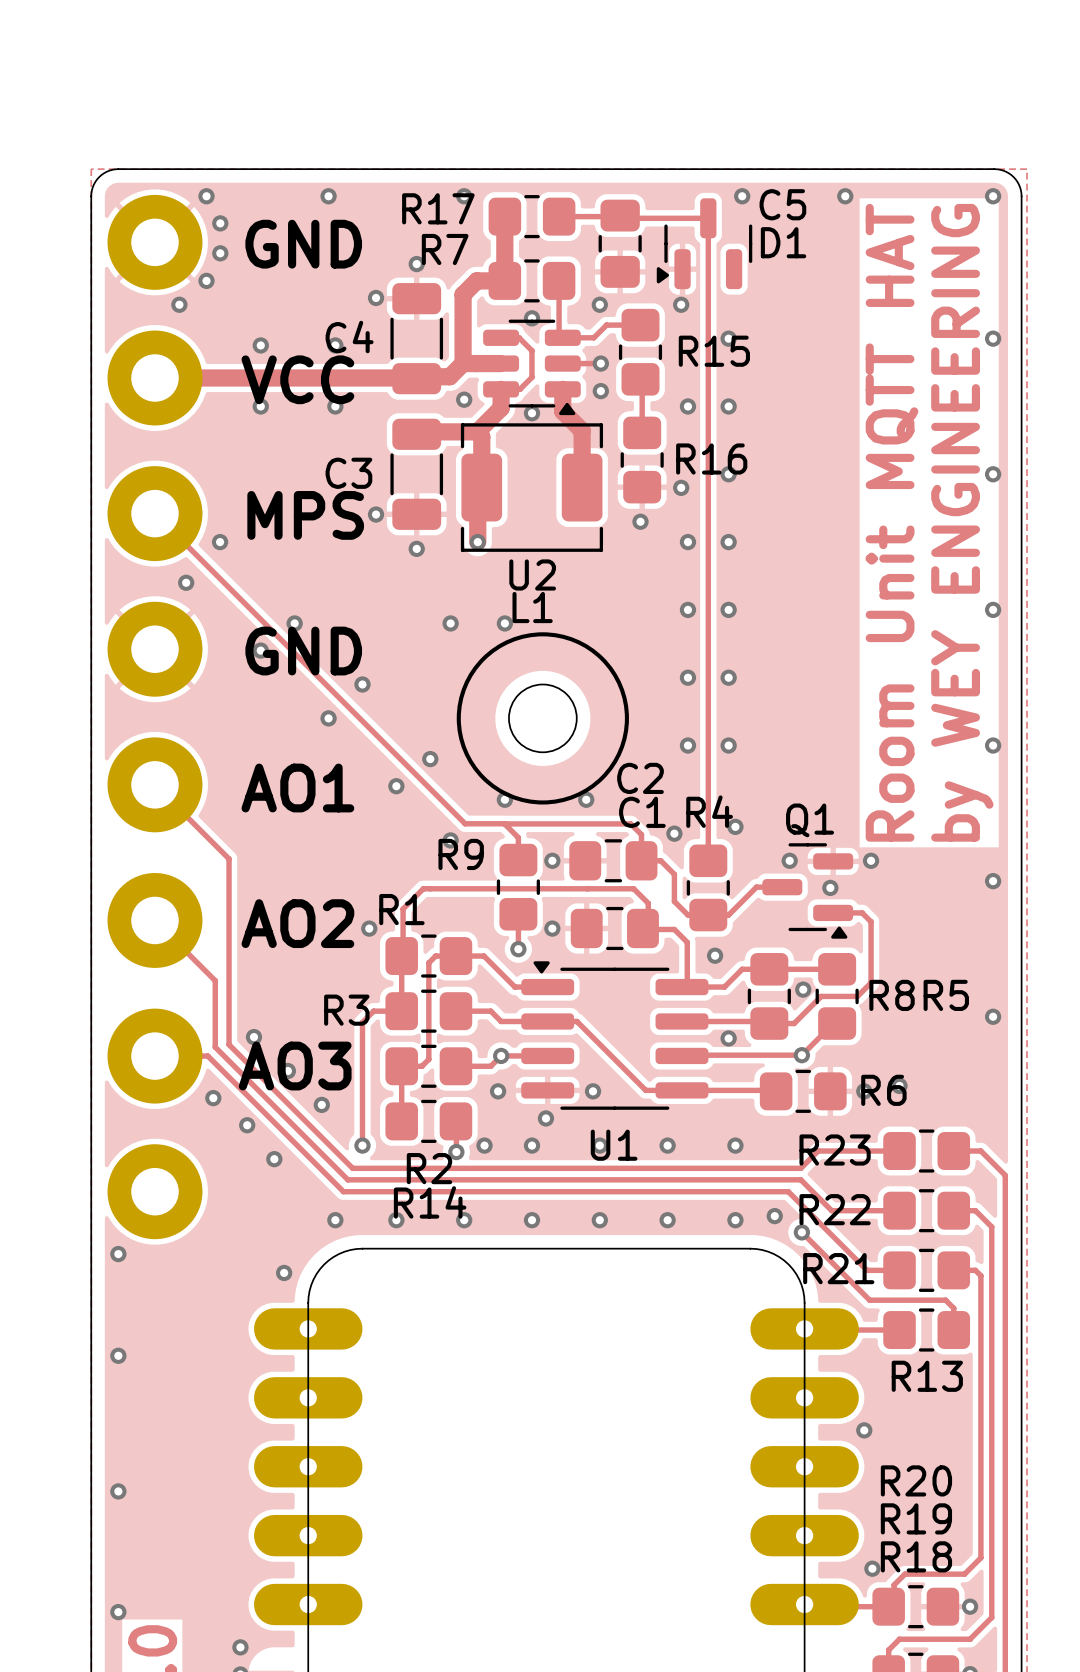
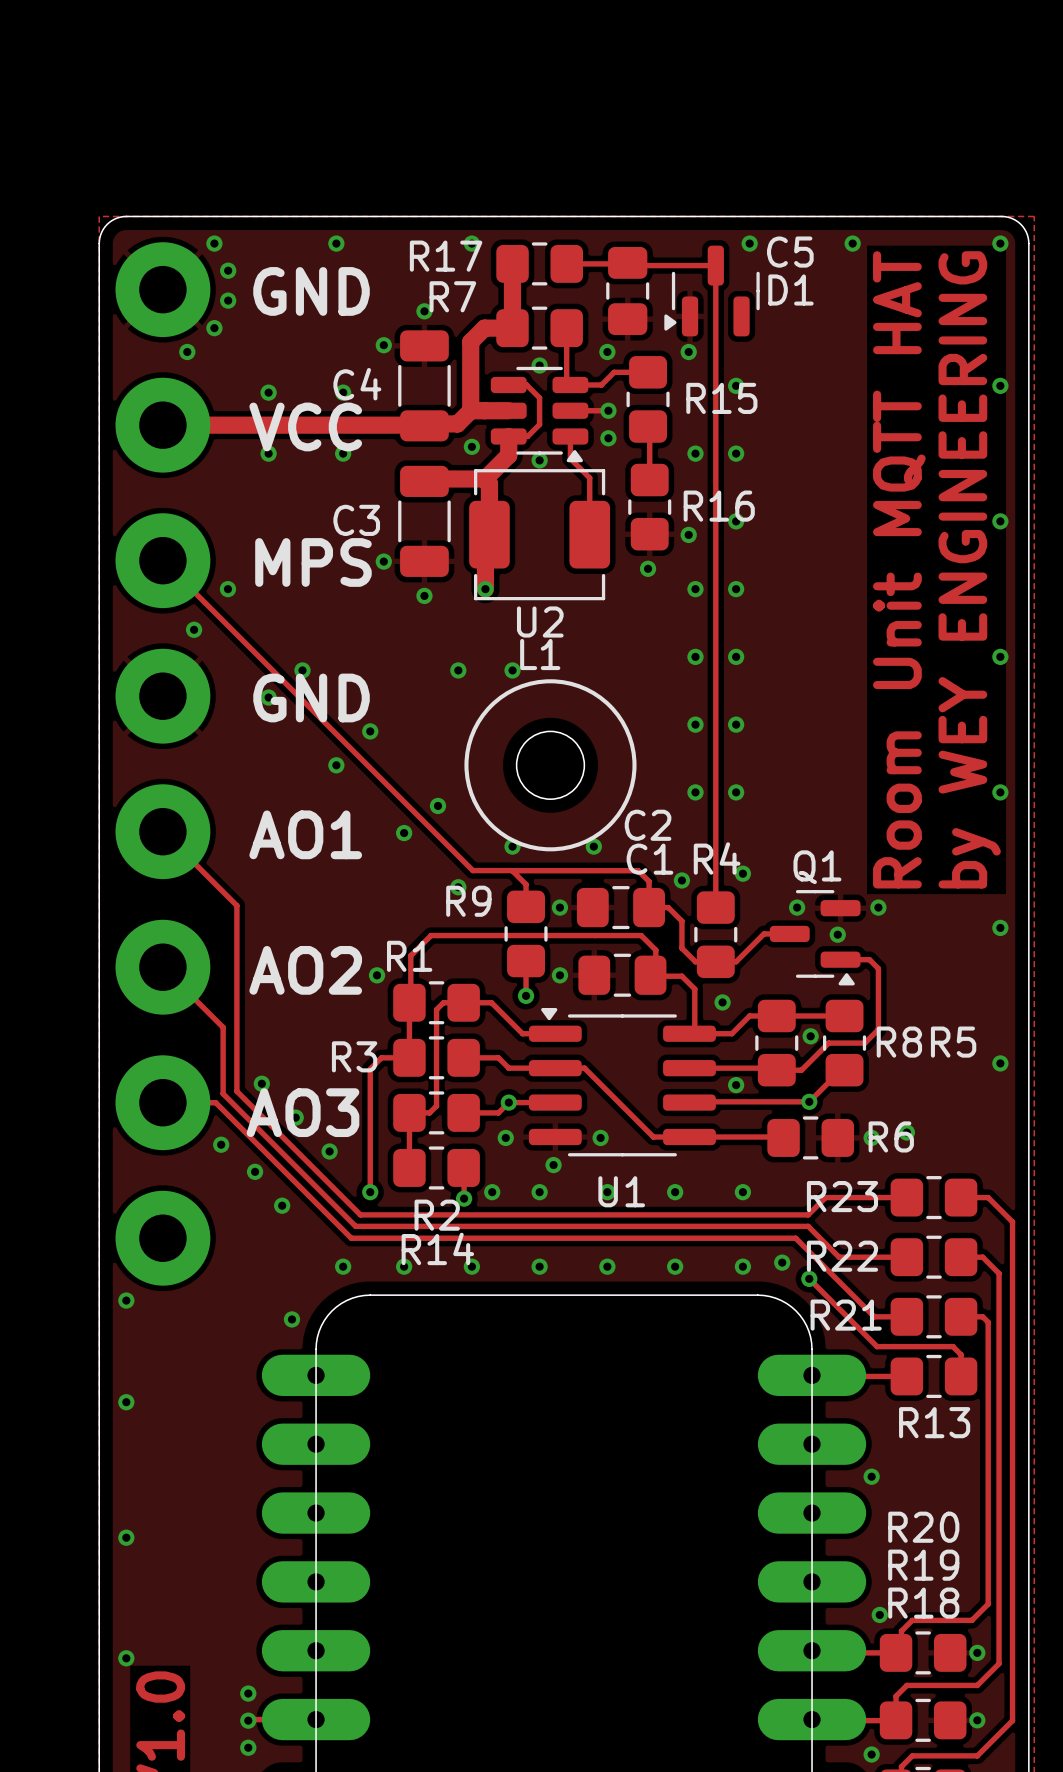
track width: thick (562, 389) (562, 411) (582, 430) (582, 487) -> thin (570, 436) (570, 458) (589, 477) (589, 534)
L1 footprint: [460, 423, 604, 552] -> [469, 469, 611, 601]

